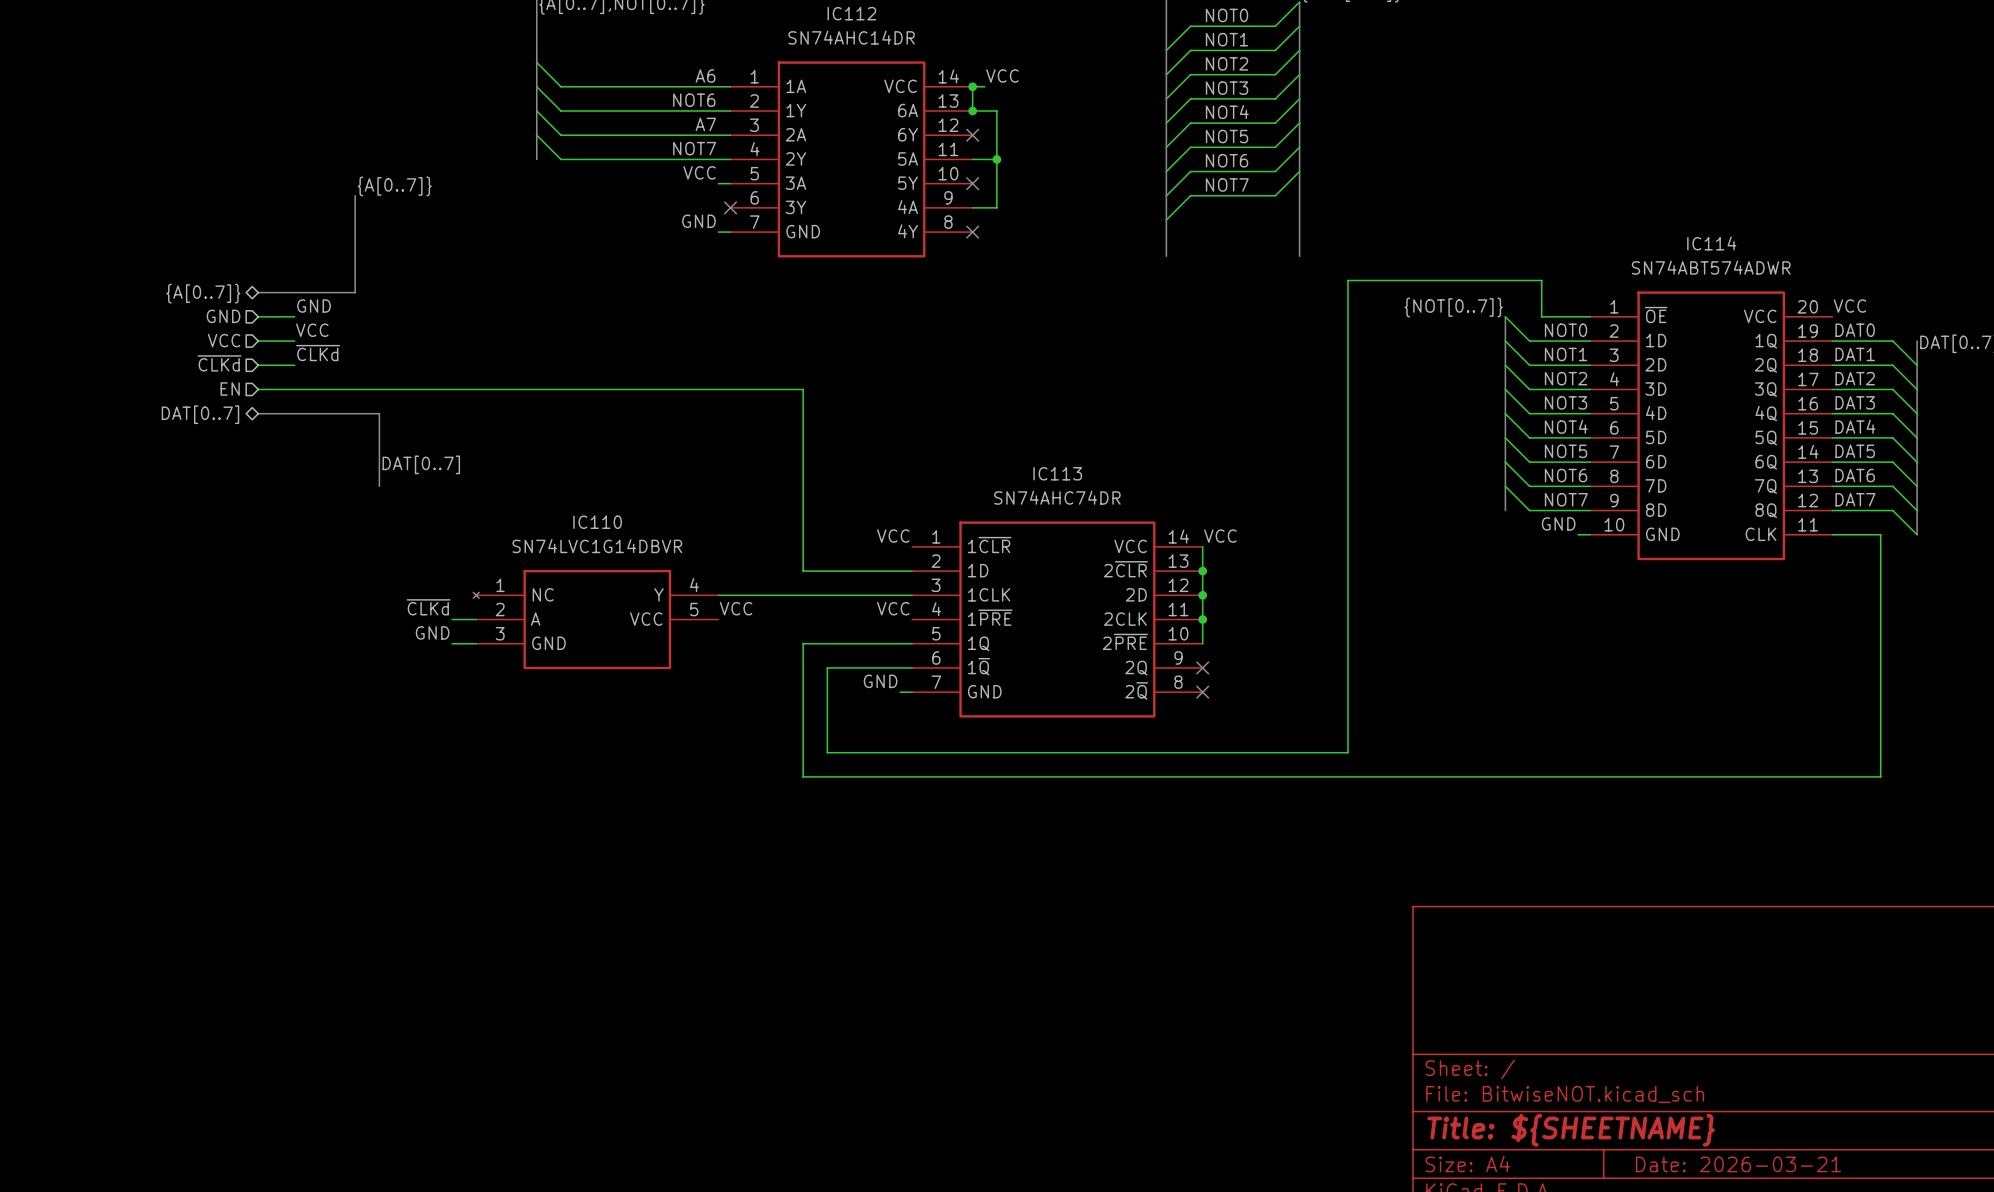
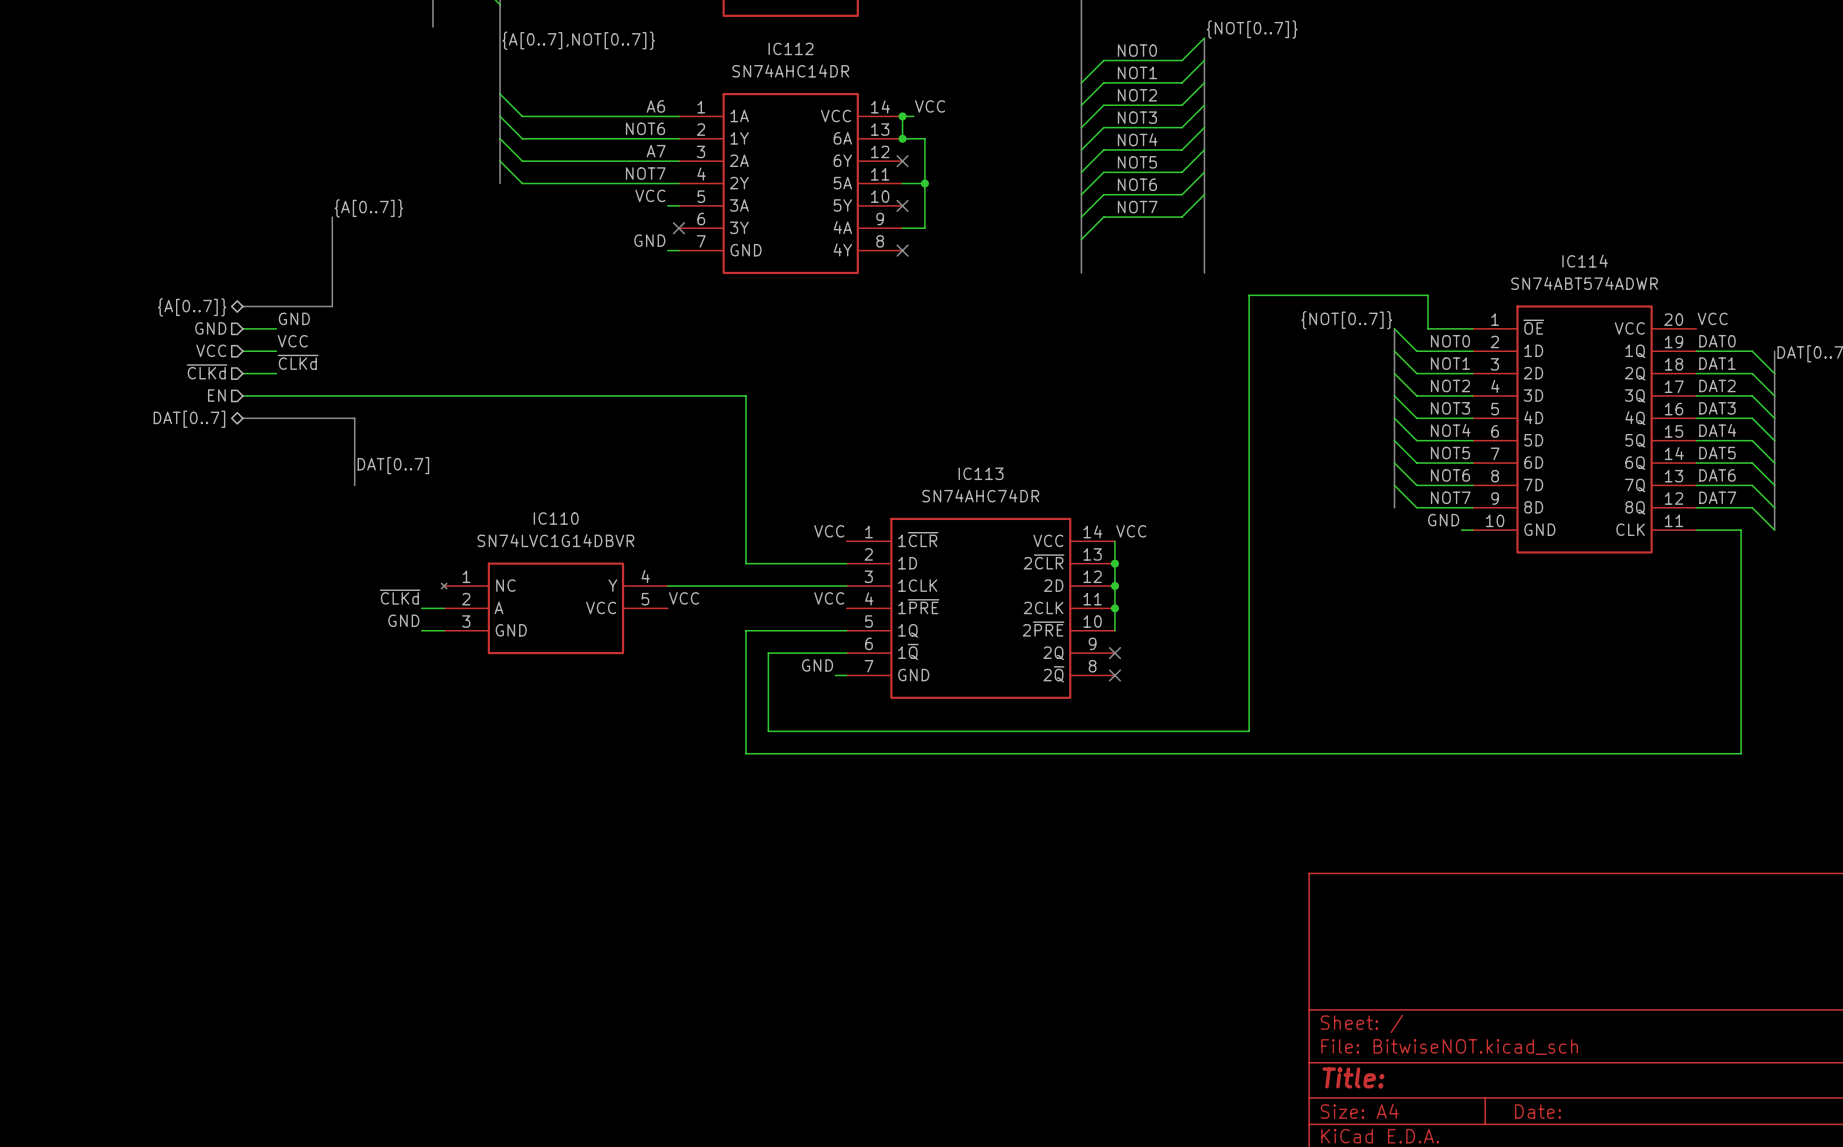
title block: Title: ${SHEETNAME} (1571, 1130) -> Title: (1353, 1077)
title block: Date: 2026-03-21 (1738, 1164) -> Date: (1538, 1111)

